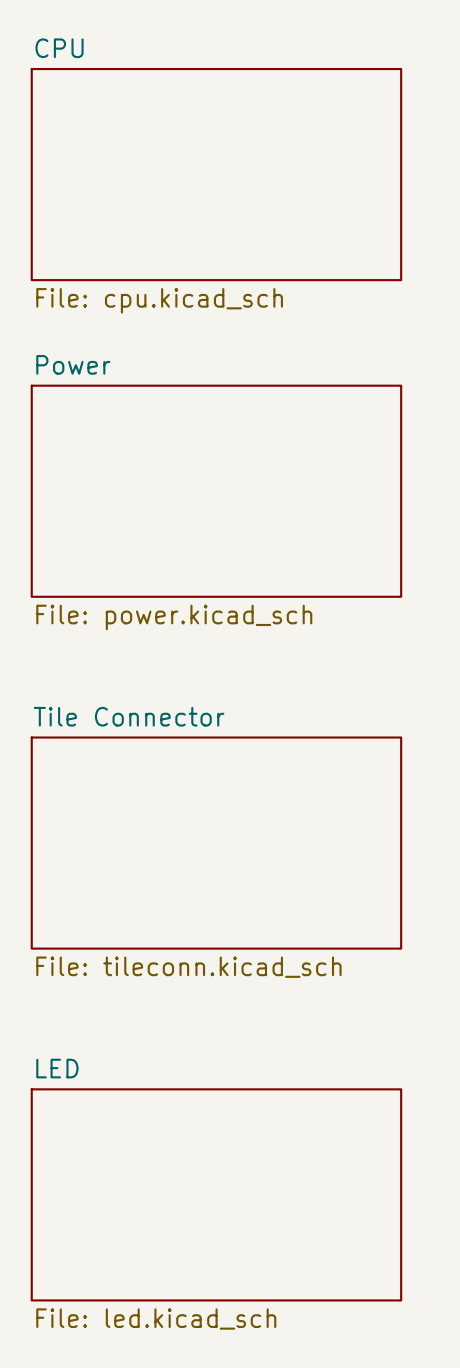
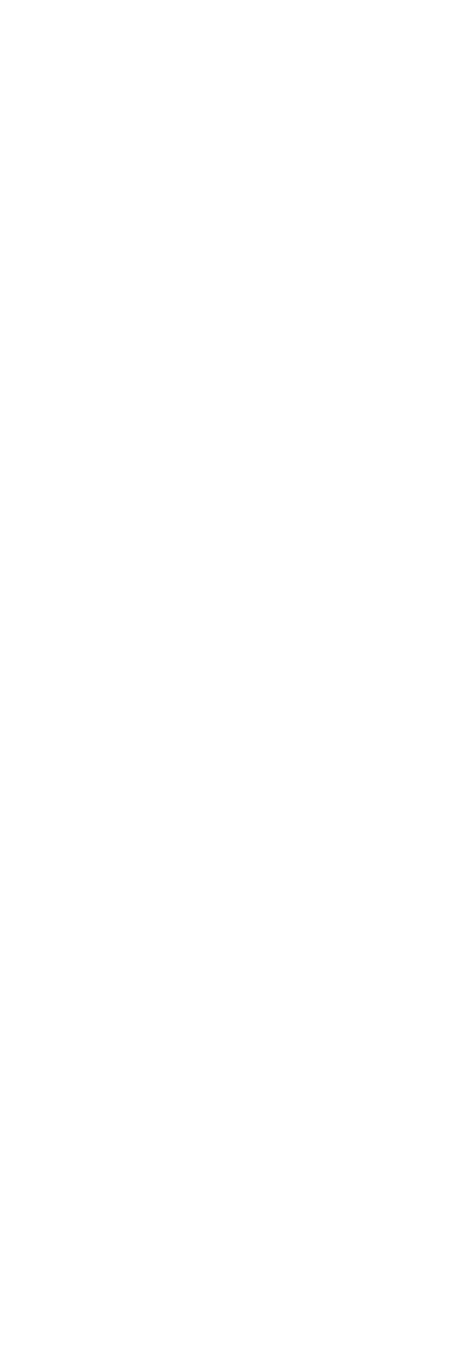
sheet CPU: File: cpu.kicad_sch (216, 174) -> none
sheet Power: File: power.kicad_sch (216, 491) -> none
sheet Tile Connector: File: tileconn.kicad_sch (216, 843) -> none
sheet LED: File: led.kicad_sch (216, 1194) -> none

